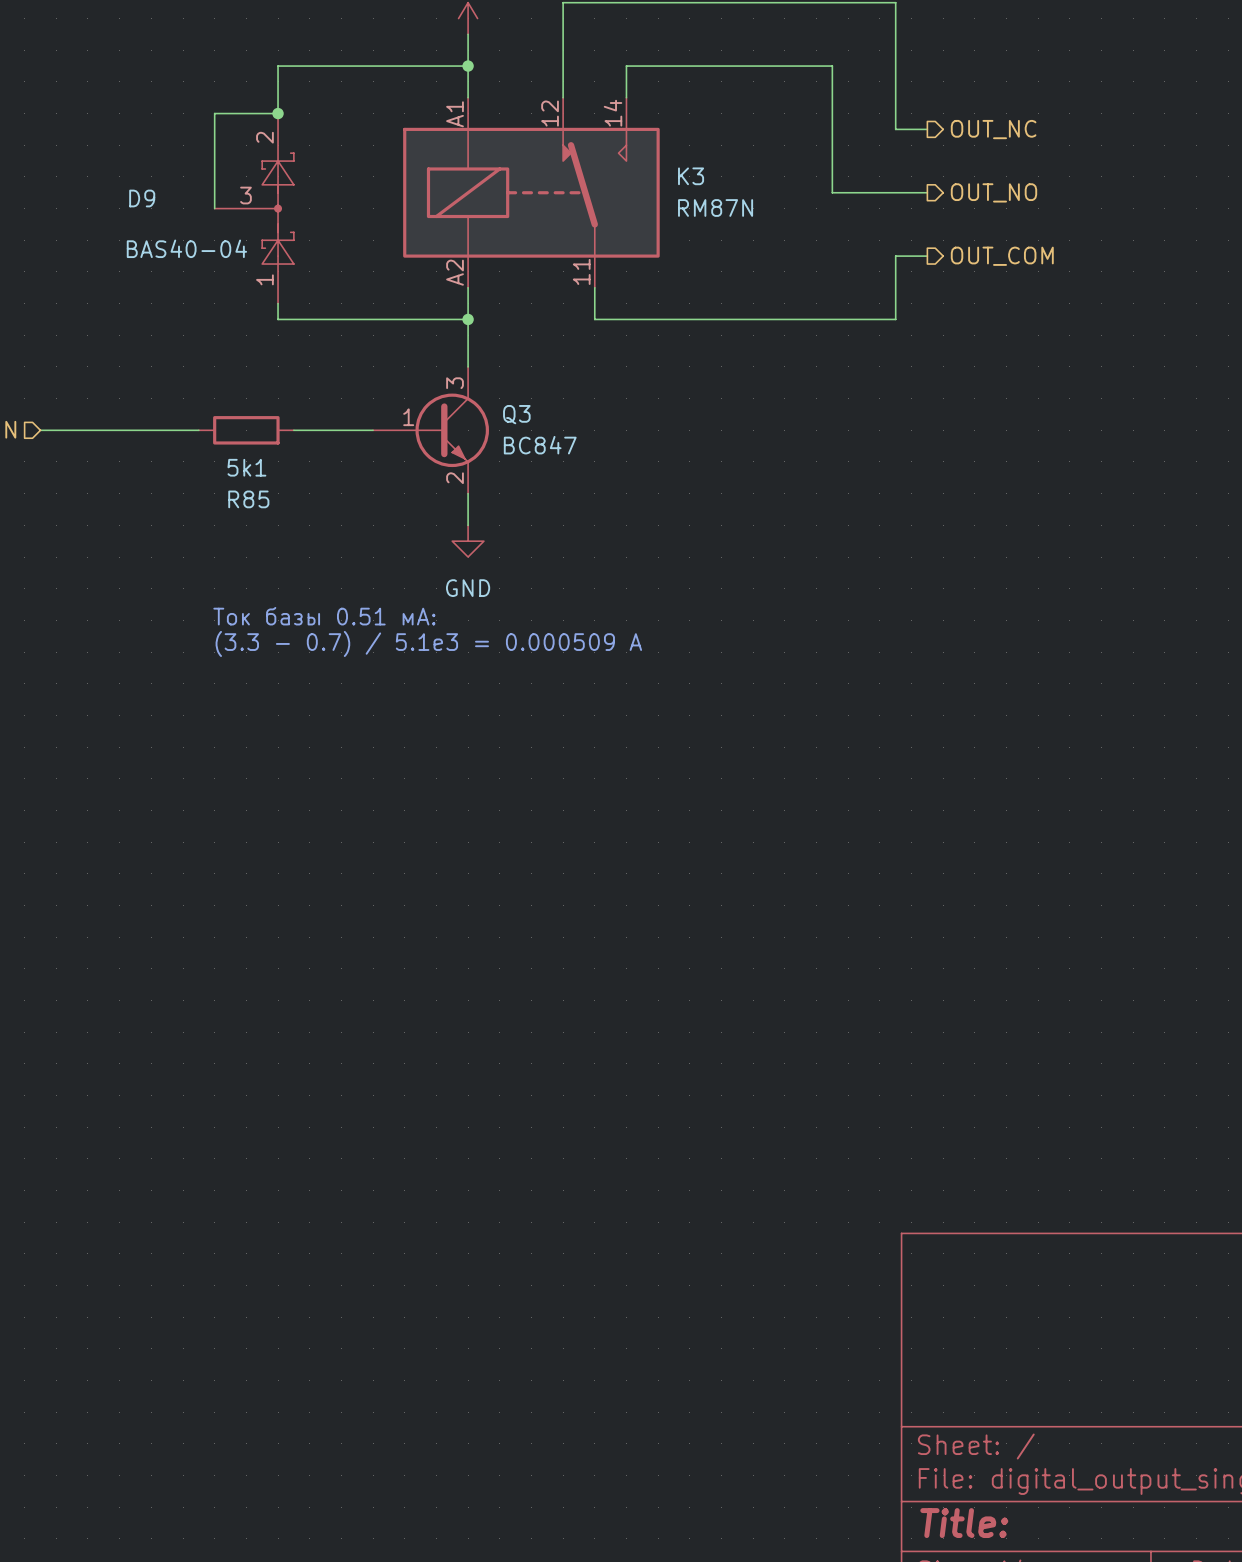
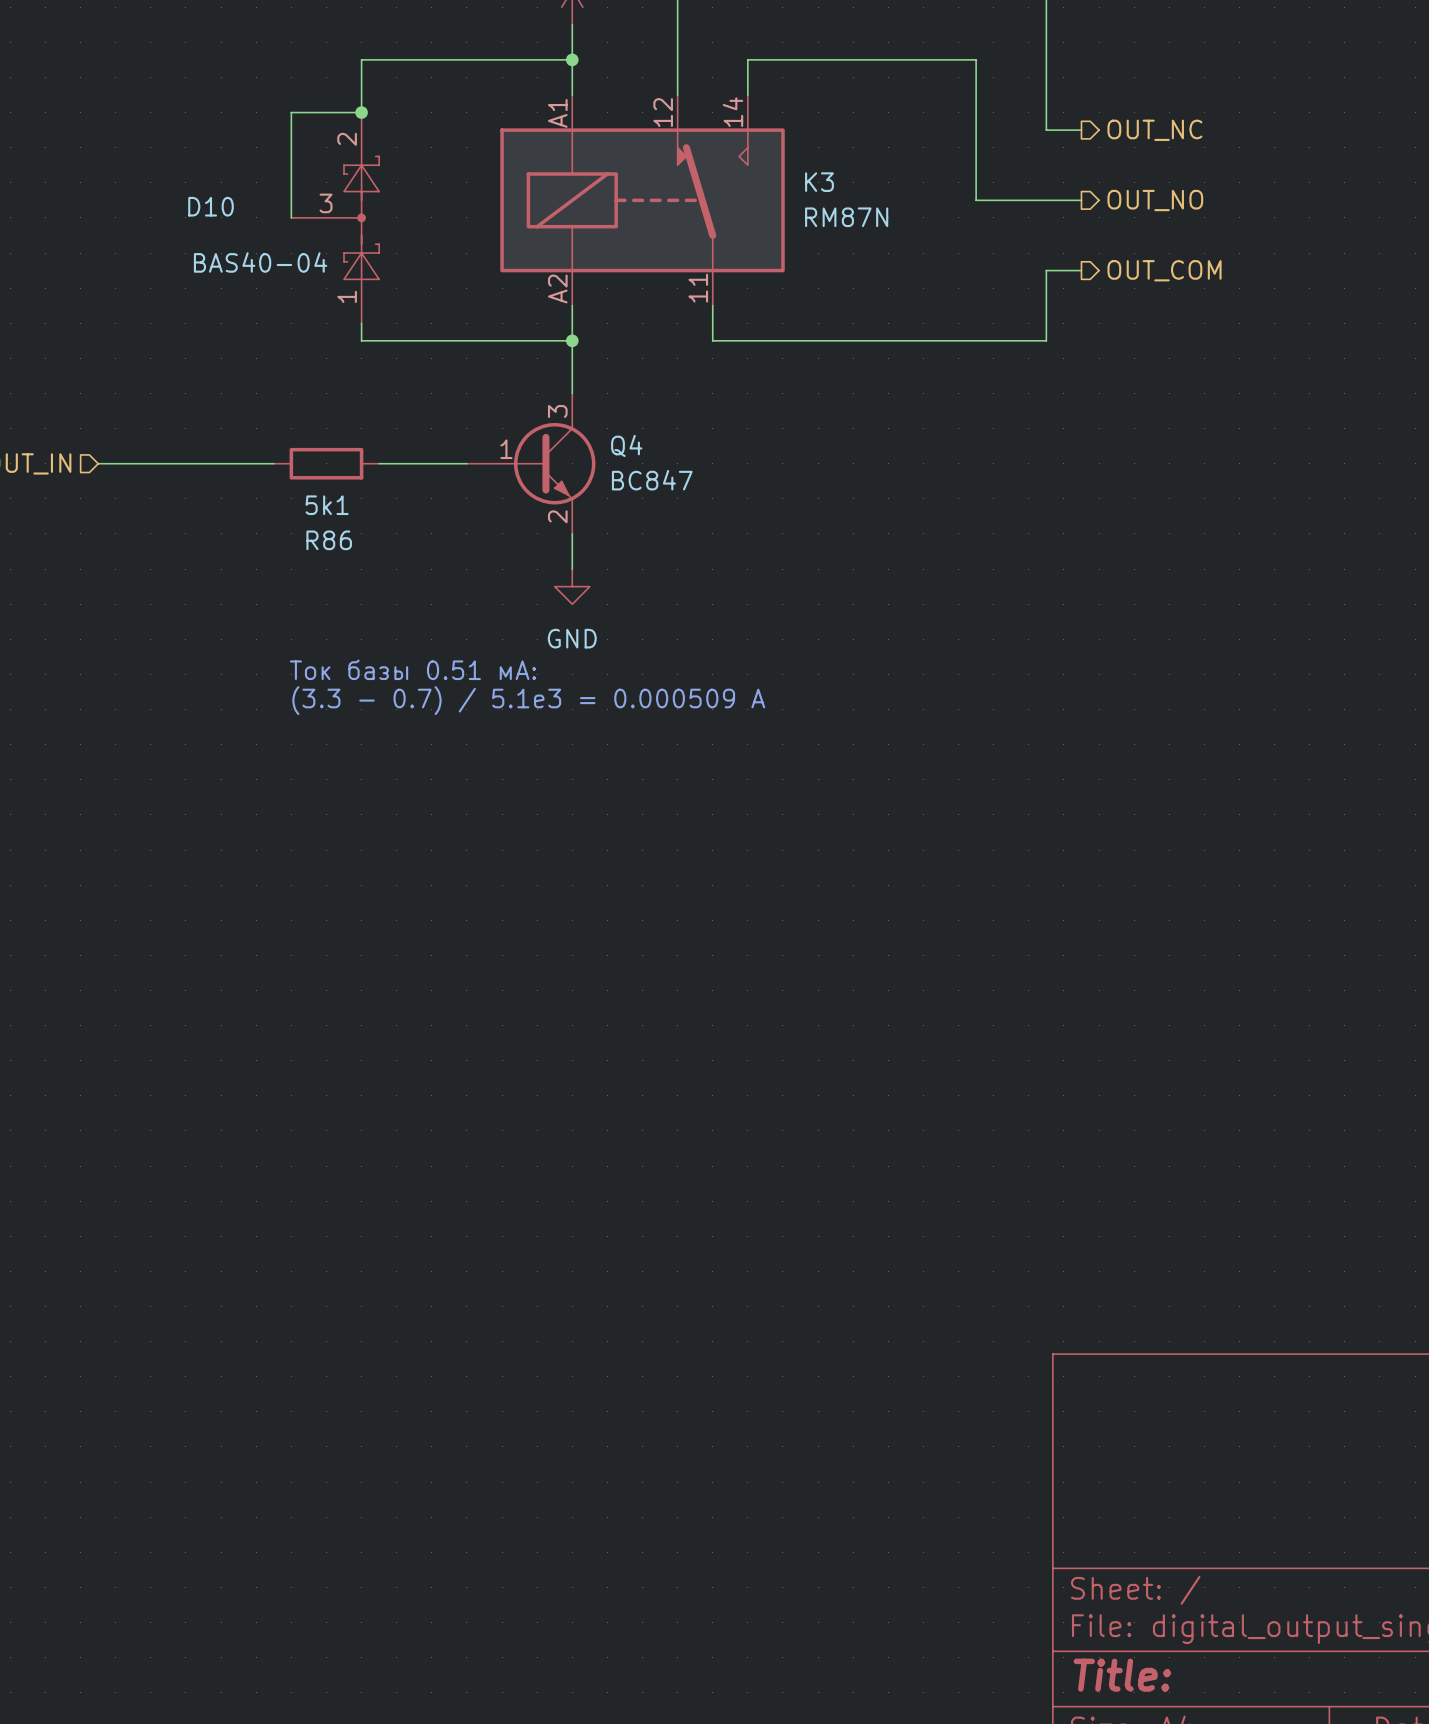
D9 name: D9 (142, 198) -> D10 (210, 206)
Q3 name: Q3 (516, 414) -> Q4 (626, 445)
R85 name: R85 (248, 499) -> R86 (329, 540)

